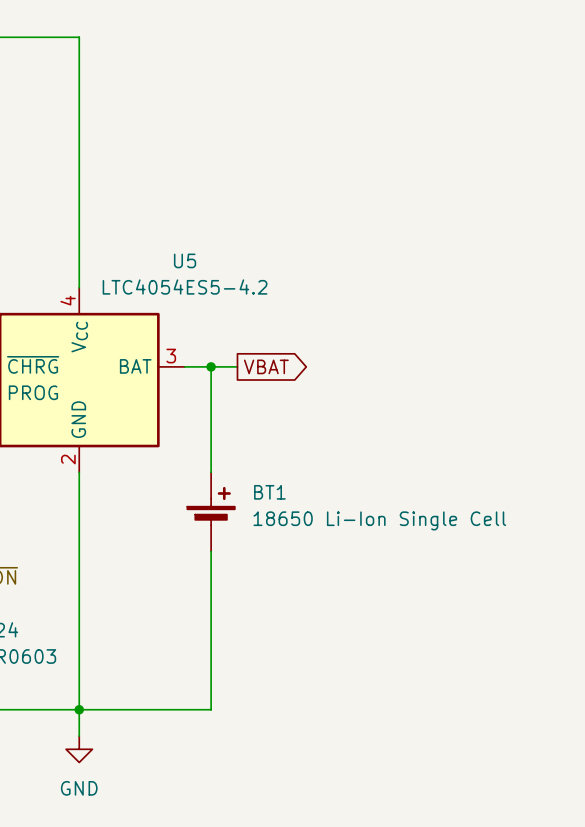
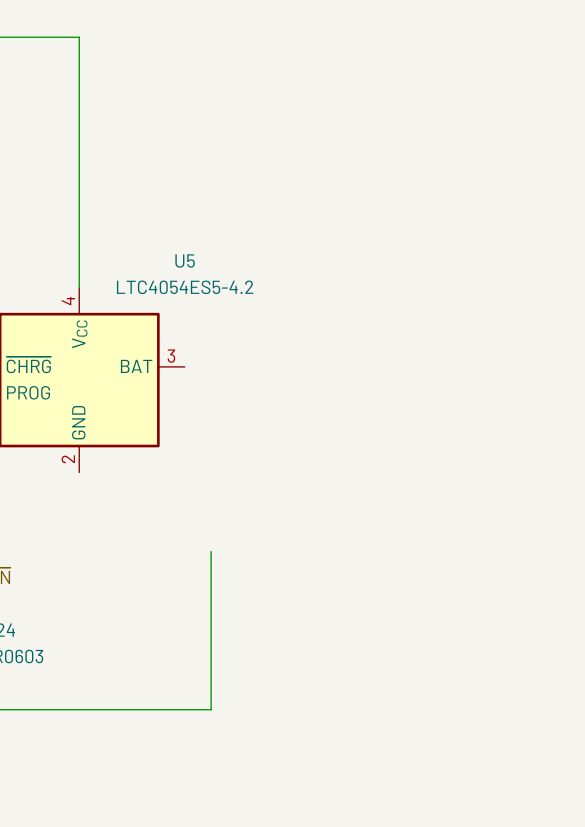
wire: (184, 366) (237, 366) -> none
wire: (211, 366) (211, 472) -> none
junction: (211, 366) -> none
global label: VBAT (266, 366) -> none
wire: (79, 472) (79, 736) -> none
BT1: 18650 Li-Ion Single Cell (211, 511) -> none
junction: (79, 709) -> none
power symbol: GND (79, 749) -> none

